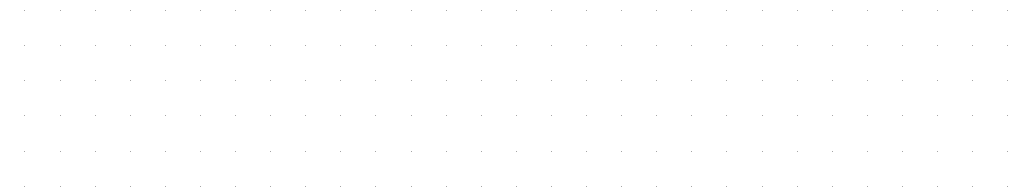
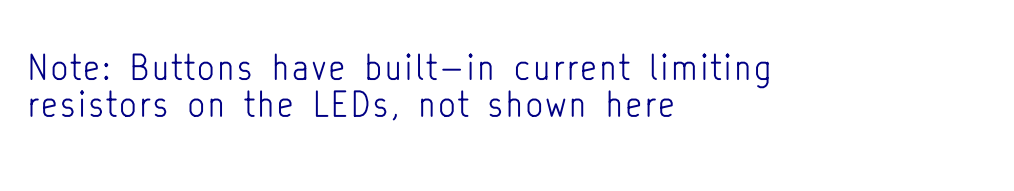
text: none -> Note: Buttons have built-in current limiting (399, 70)
text: none -> resistors on the LEDs, not shown here (351, 105)

